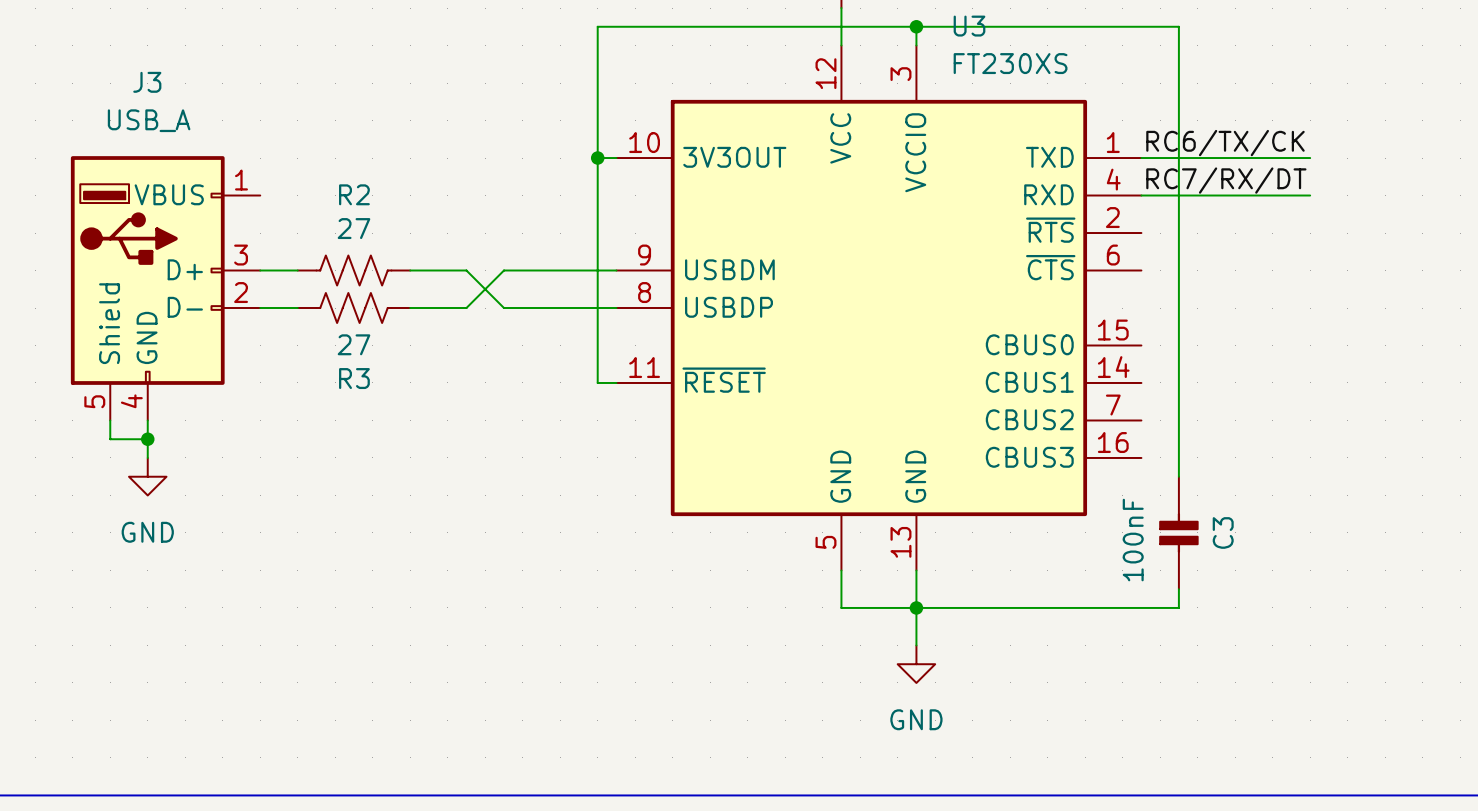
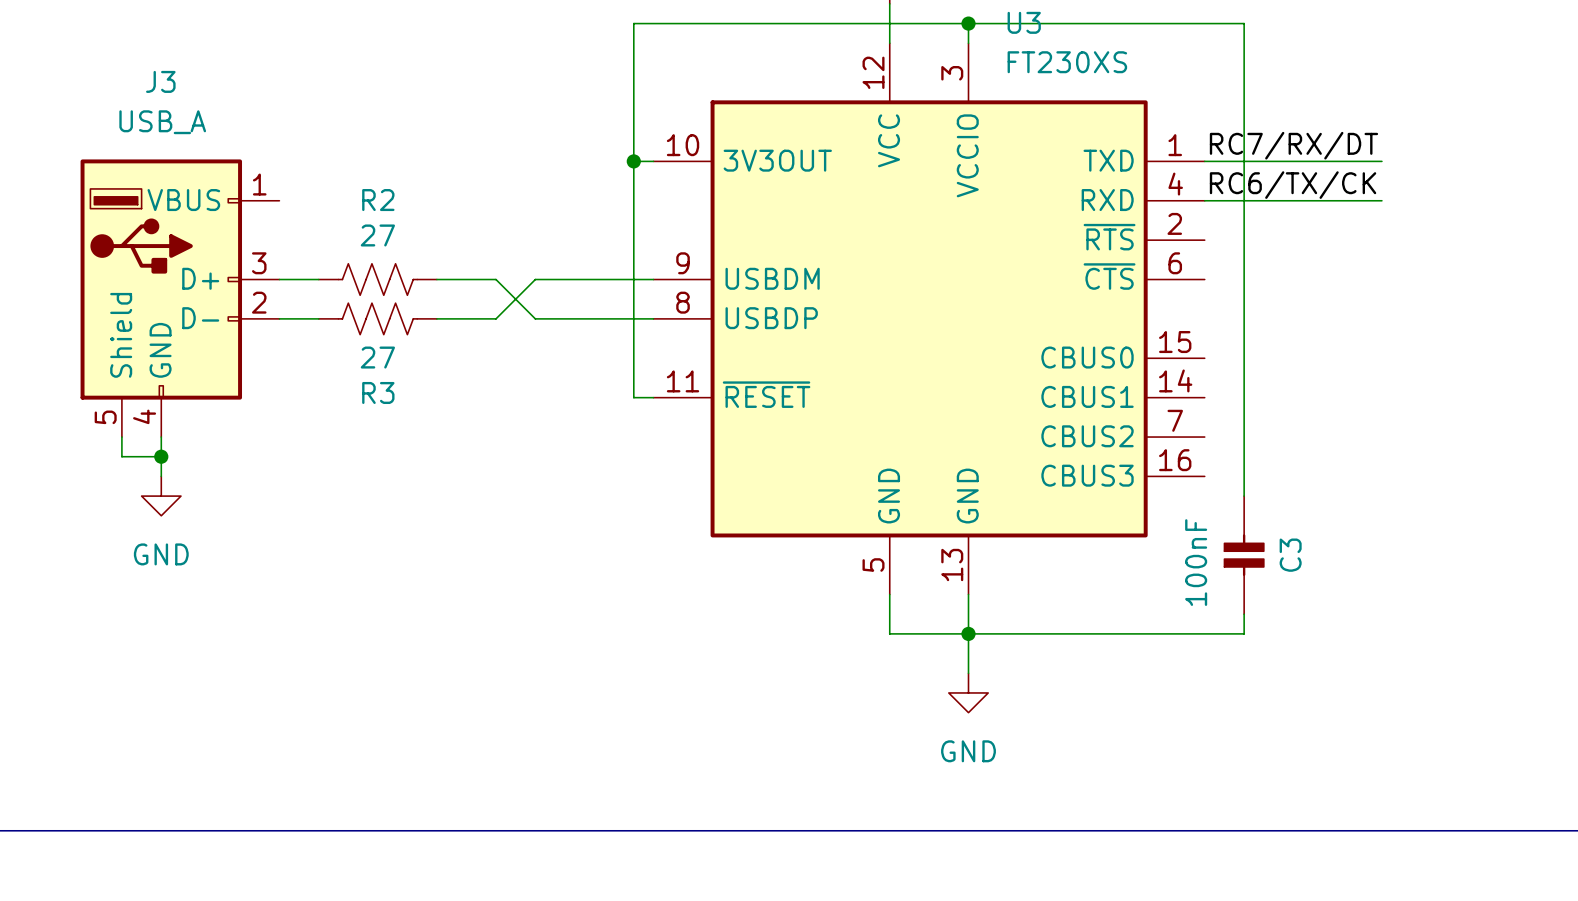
label: RC6/TX/CK (1225, 143) -> RC7/RX/DT (1293, 145)
label: RC7/RX/DT (1226, 180) -> RC6/TX/CK (1293, 185)

